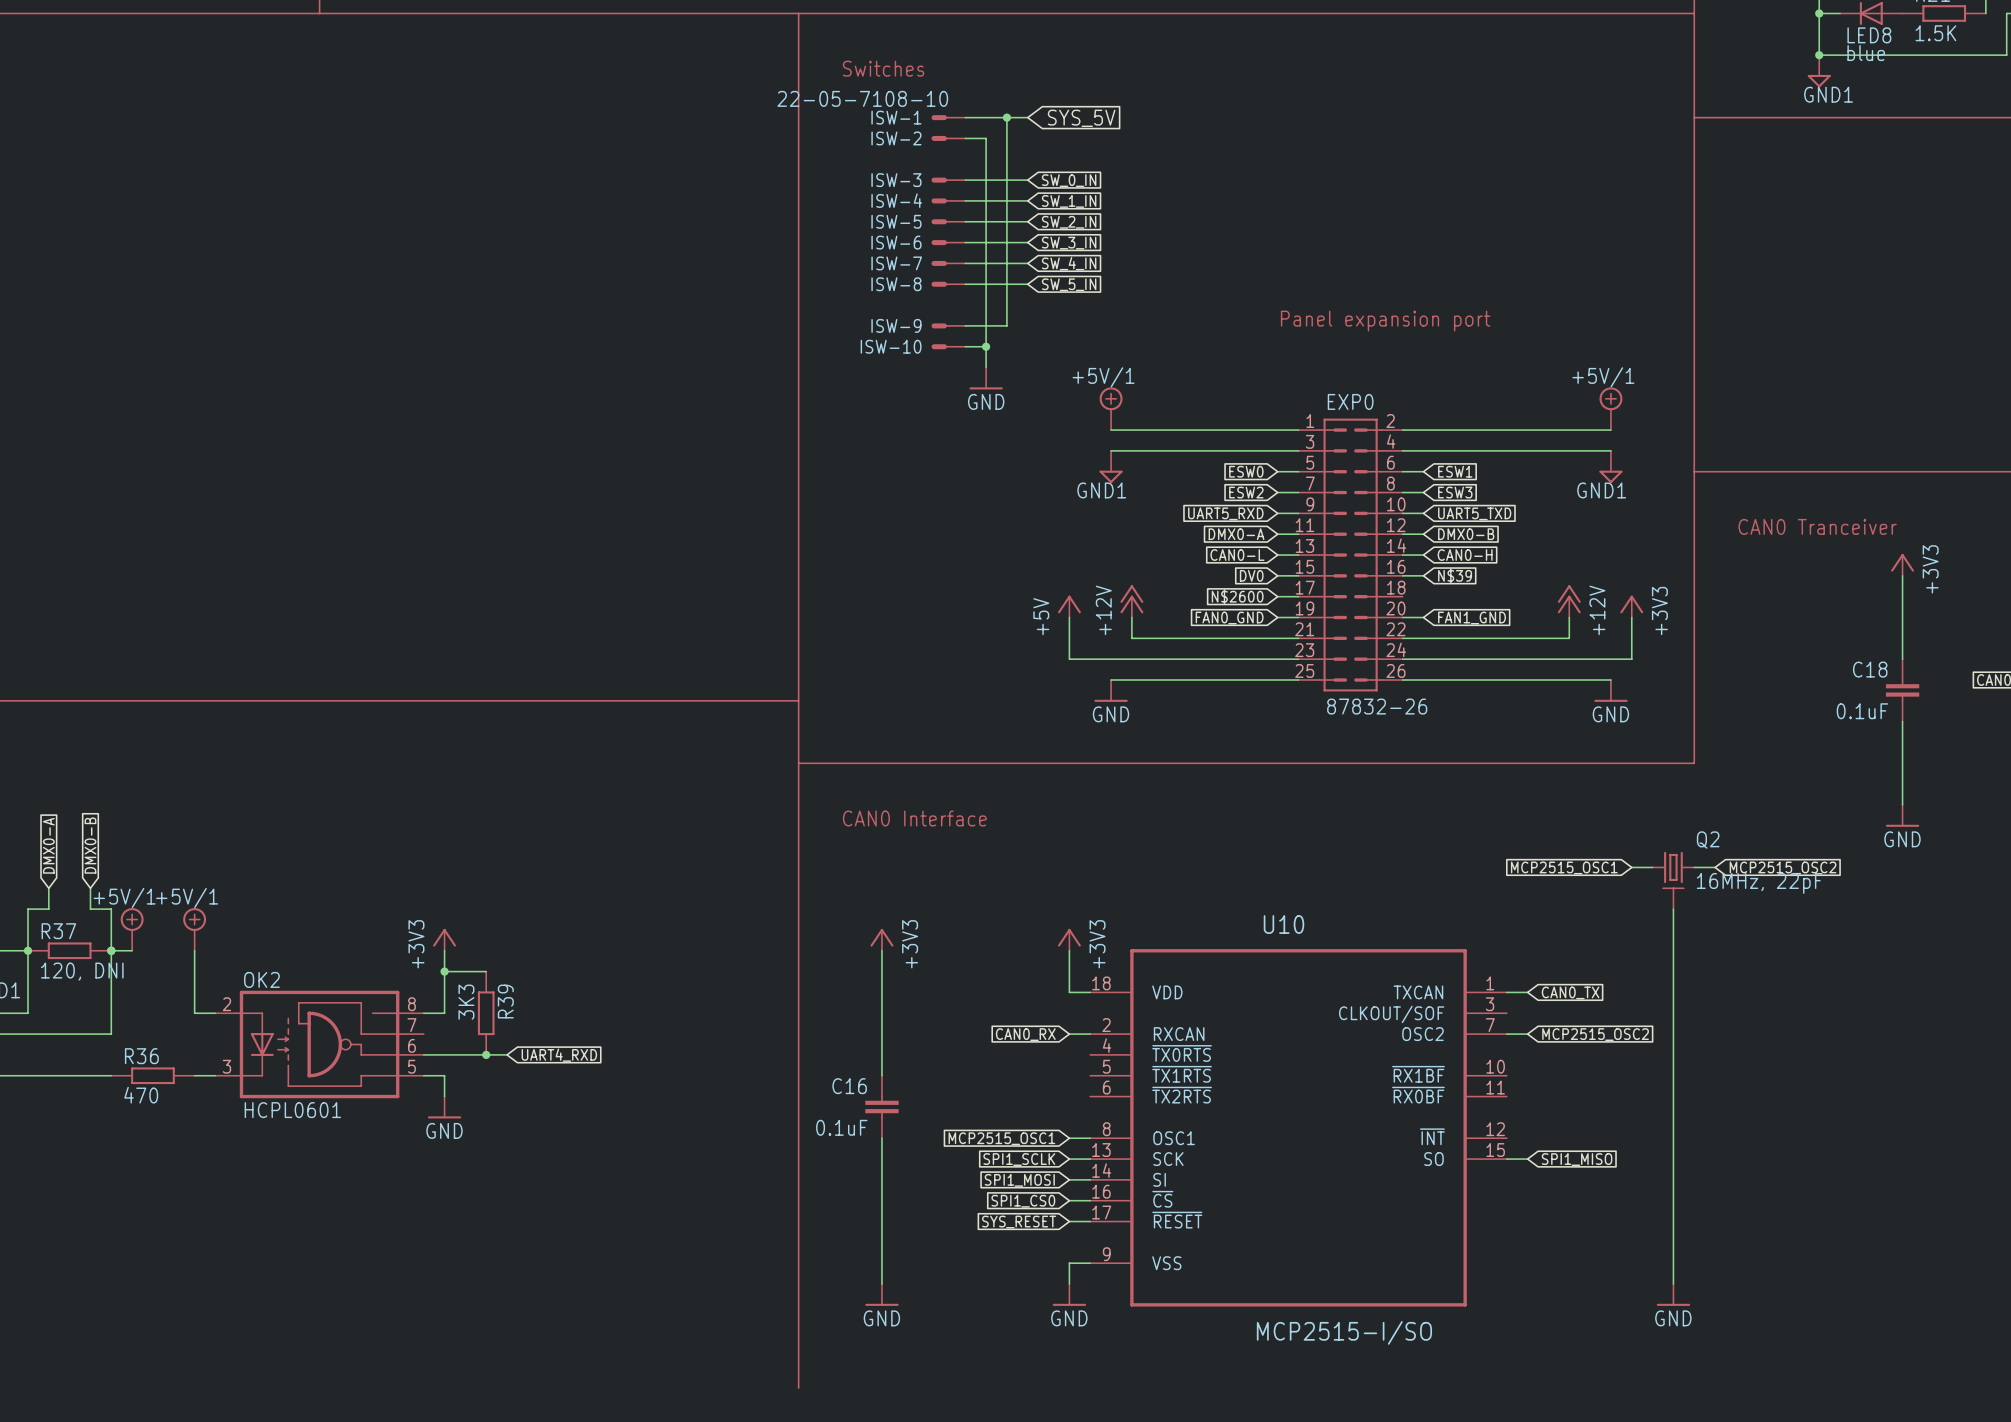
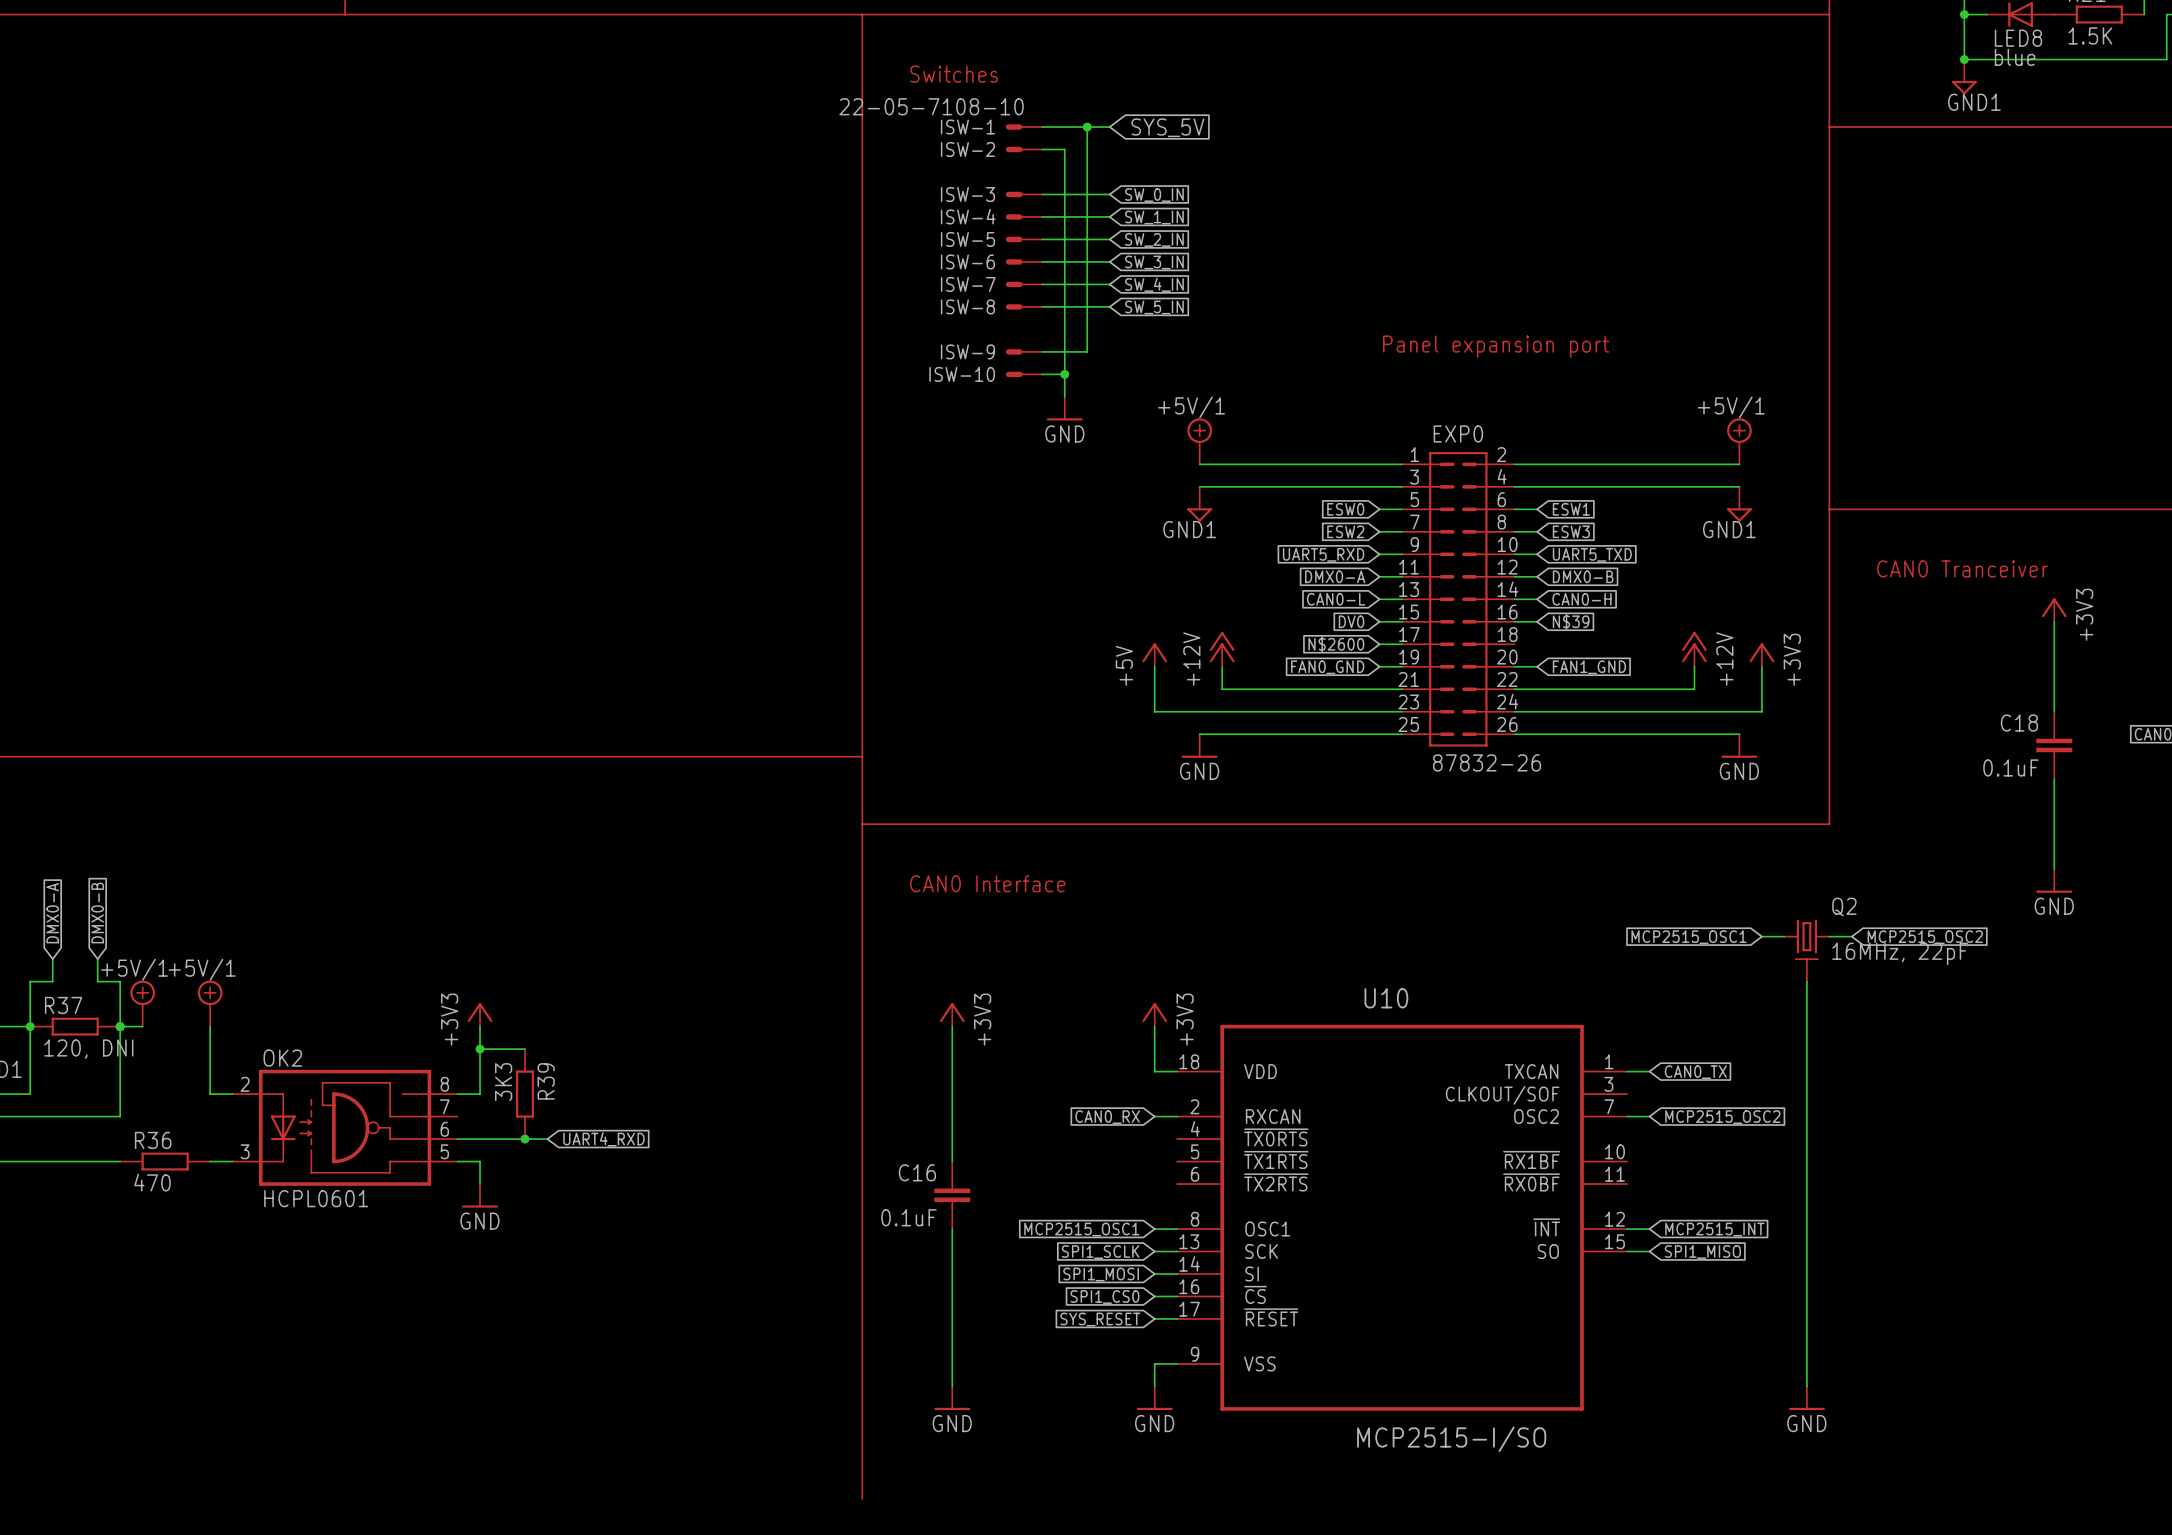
wire: none -> (1626, 1229) (1649, 1229)
global label: none -> MCP2515_INT (1714, 1229)

